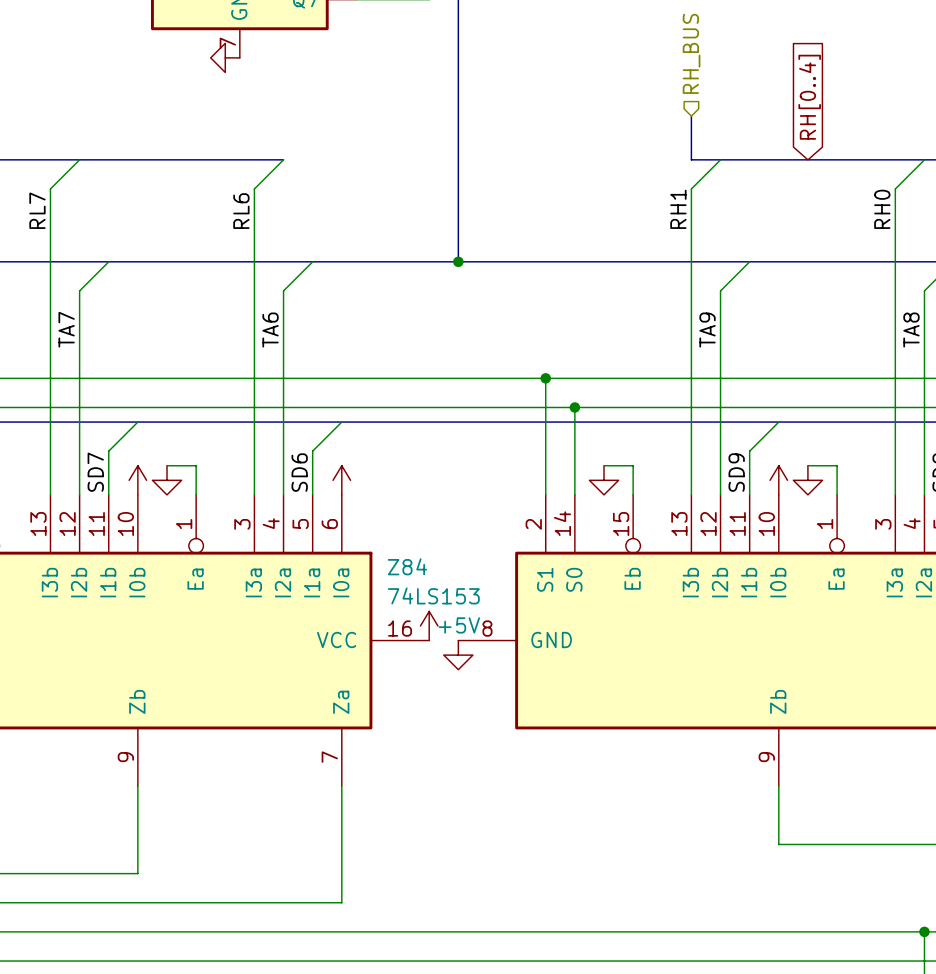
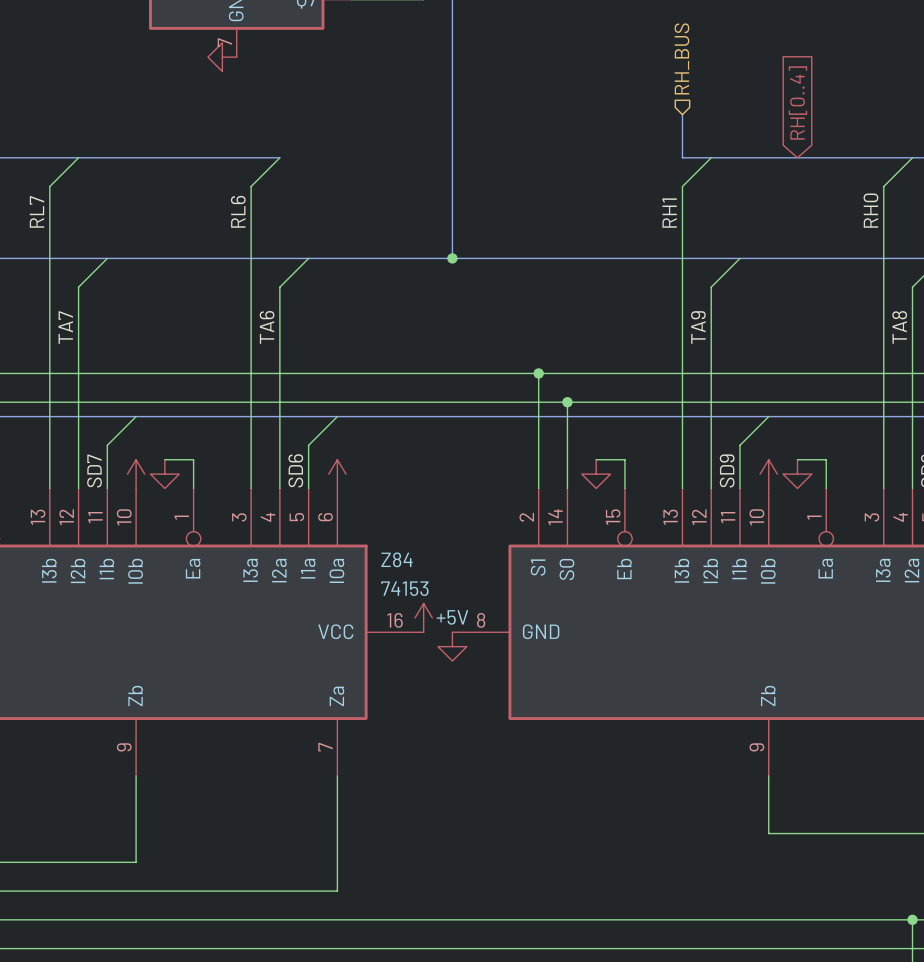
Z84 value: 74LS153 (433, 595) -> 74153 (404, 588)

